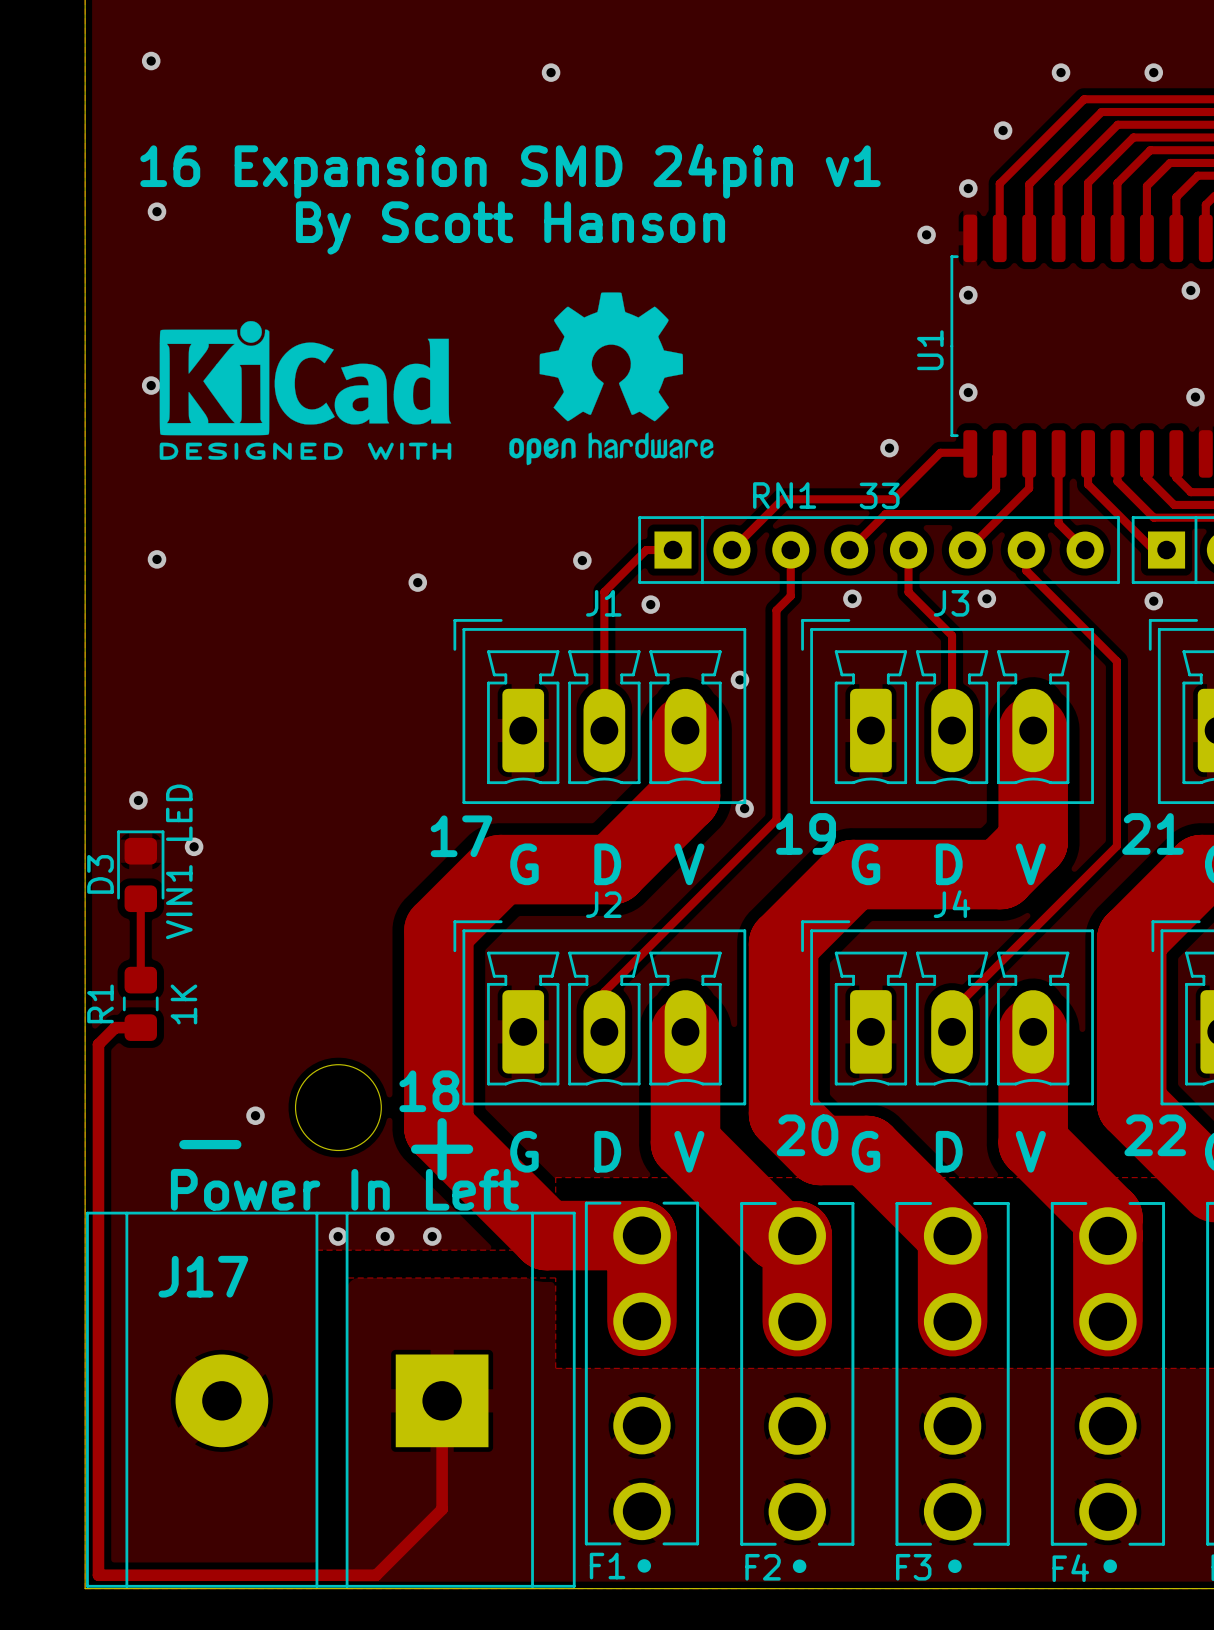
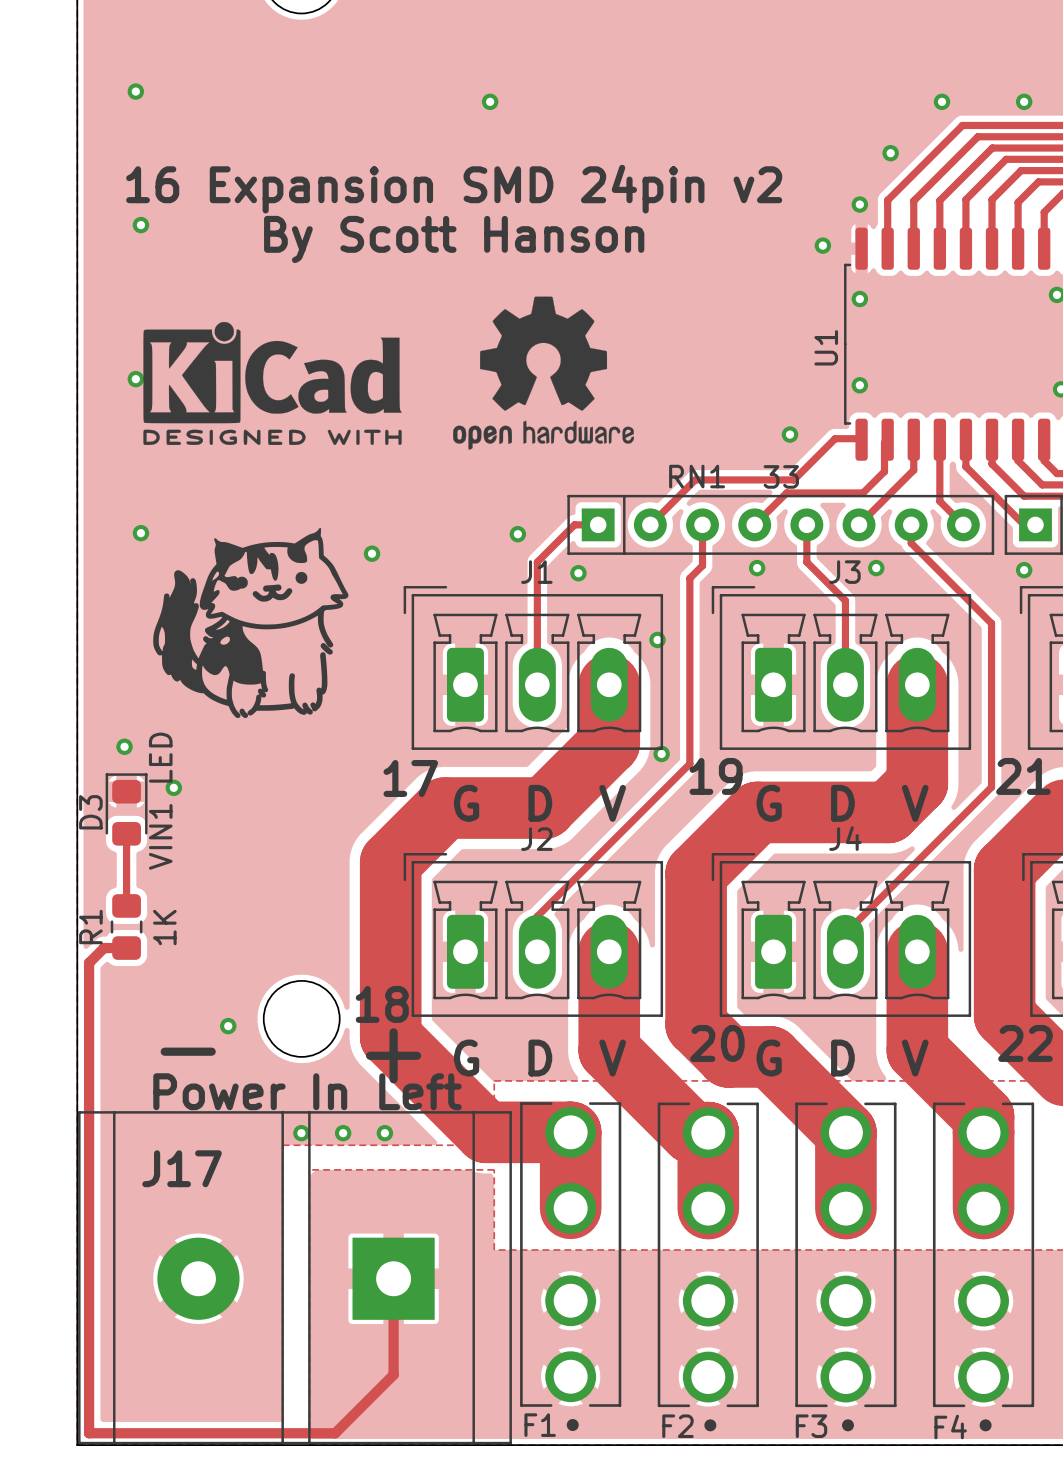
text: 16 Expansion SMD 24pin v1 (510, 171) -> 16 Expansion SMD 24pin v2 (454, 189)
drawing: none -> [153, 527, 349, 719]

